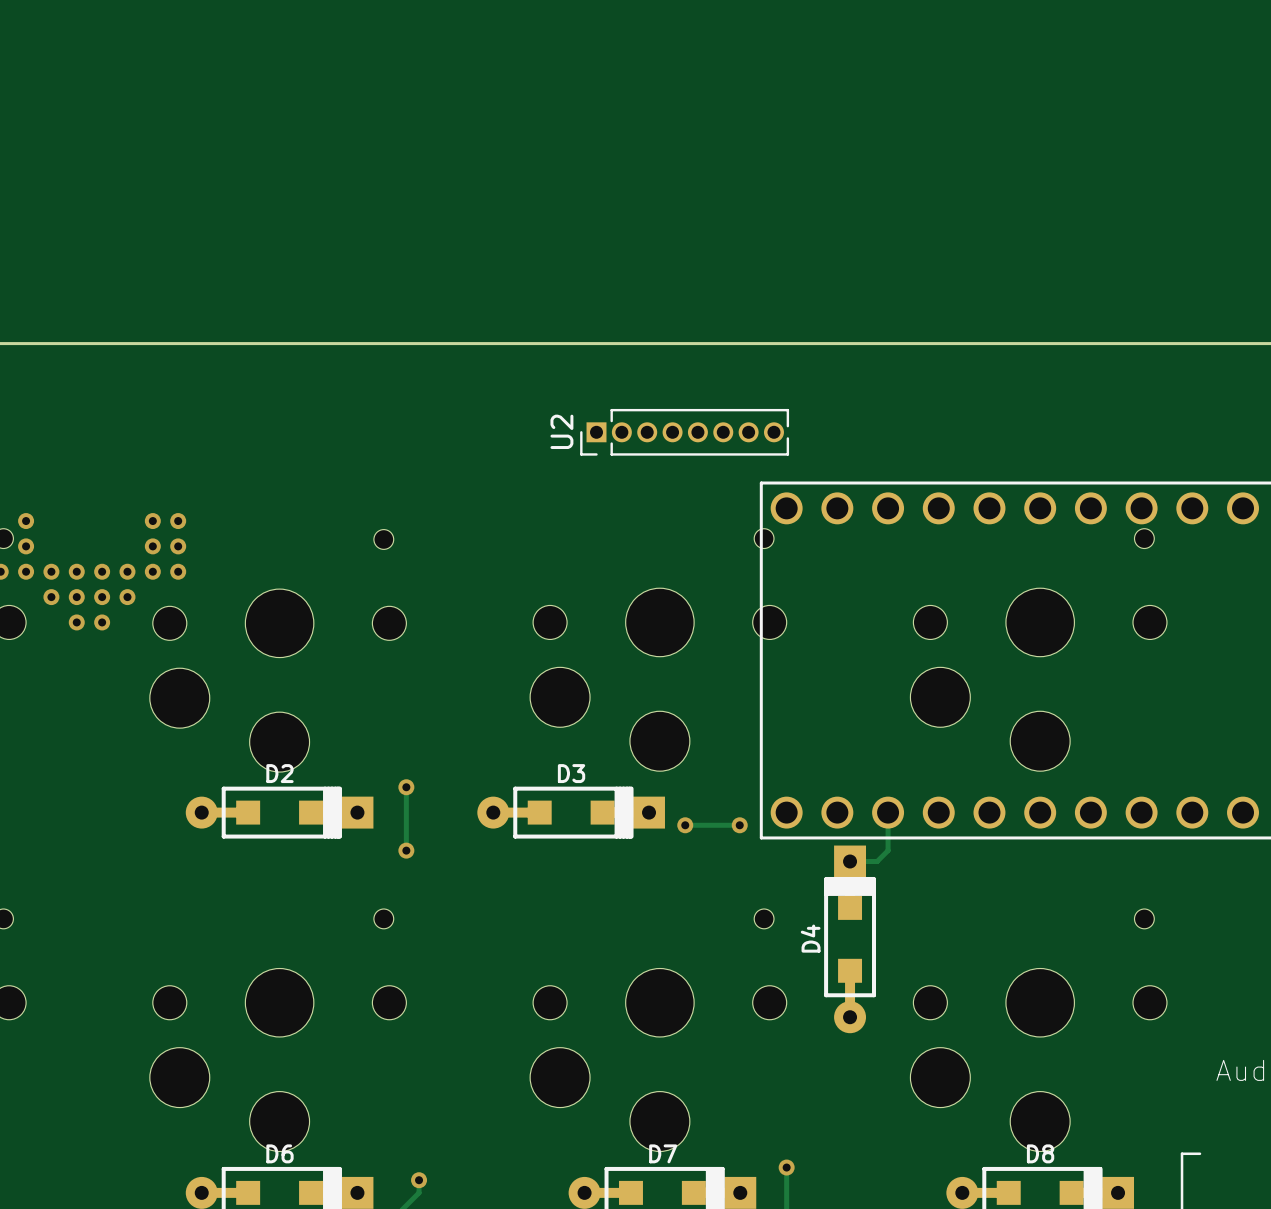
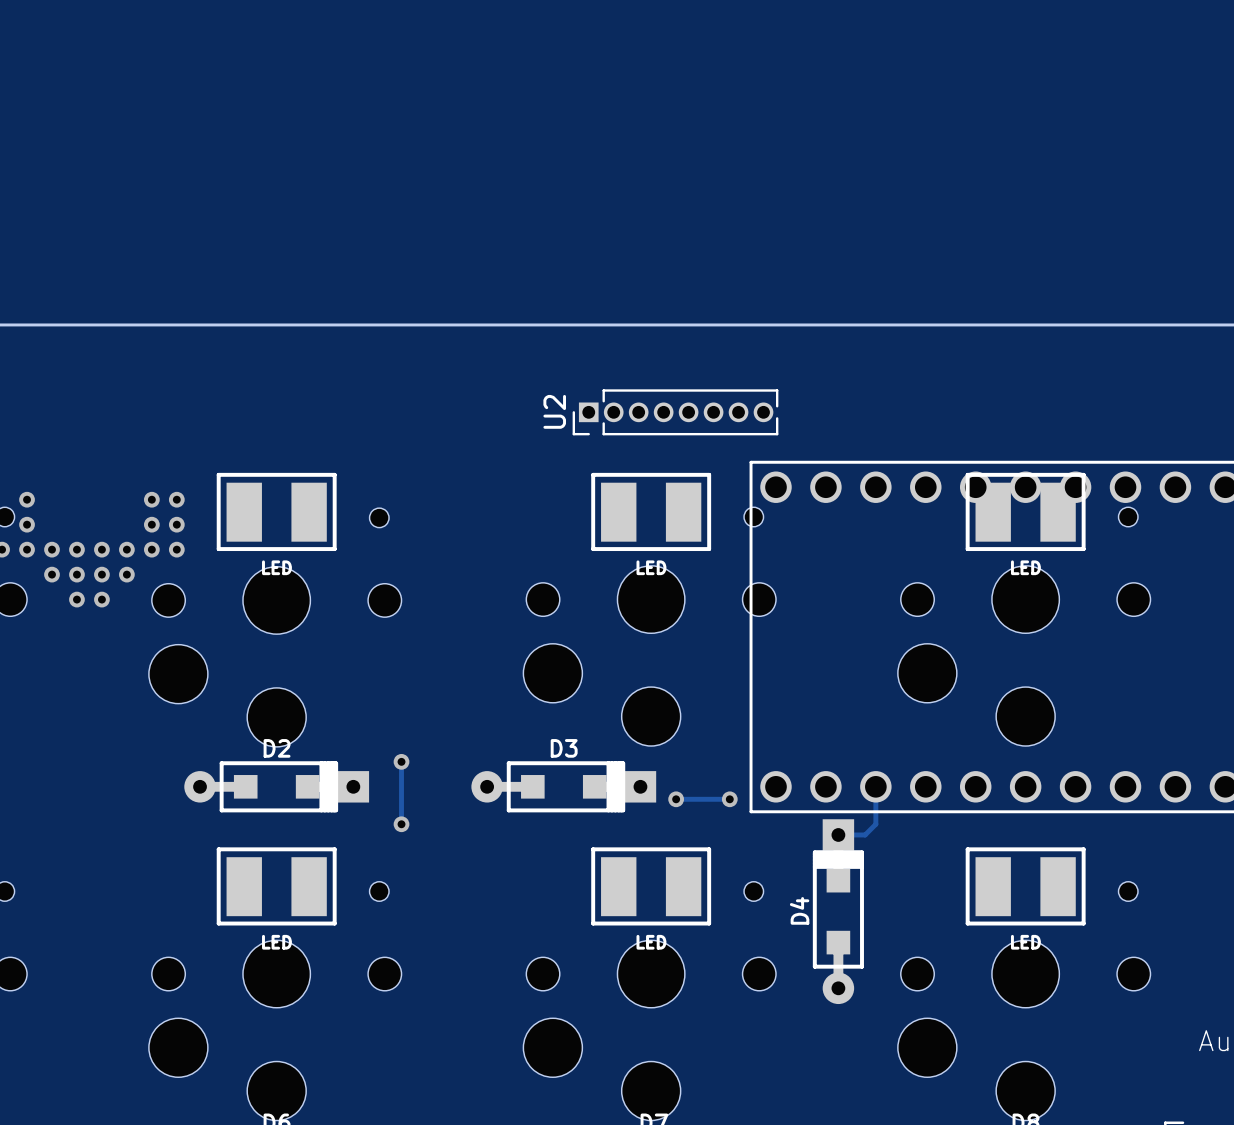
part: none -> LED (276, 511)
part: none -> LED (651, 511)
part: none -> LED (1025, 511)
part: none -> LED (276, 886)
part: none -> LED (651, 886)
part: none -> LED (1025, 886)

